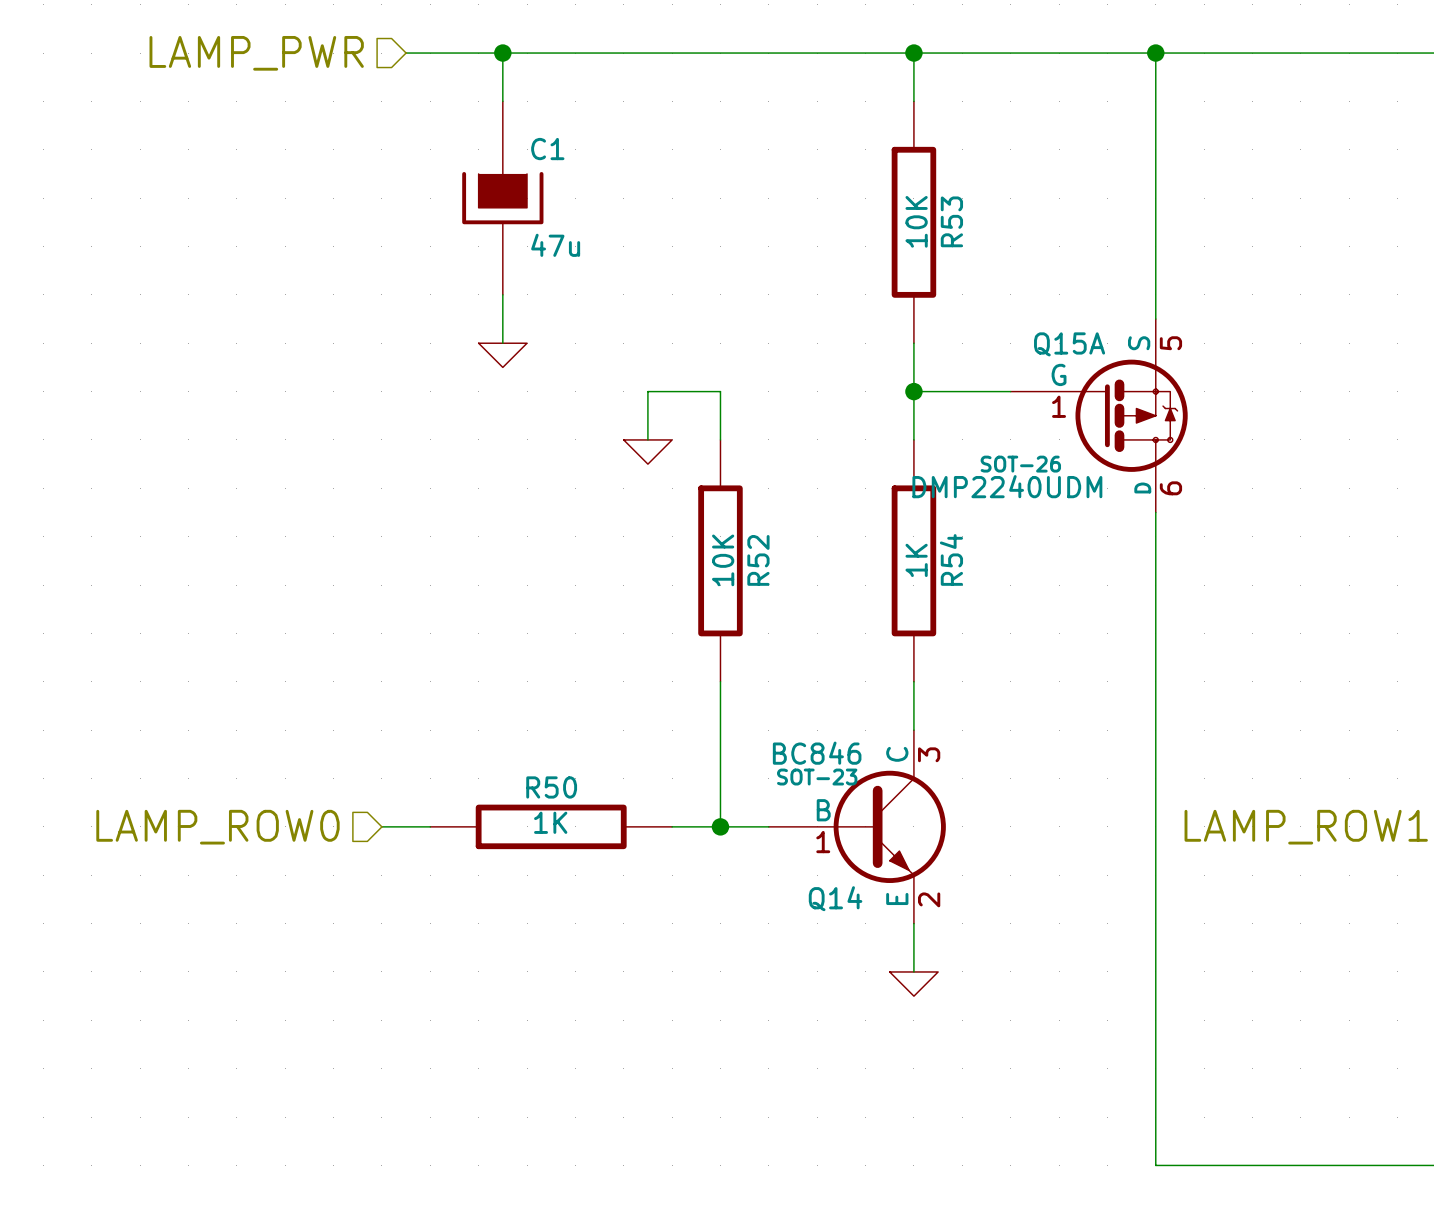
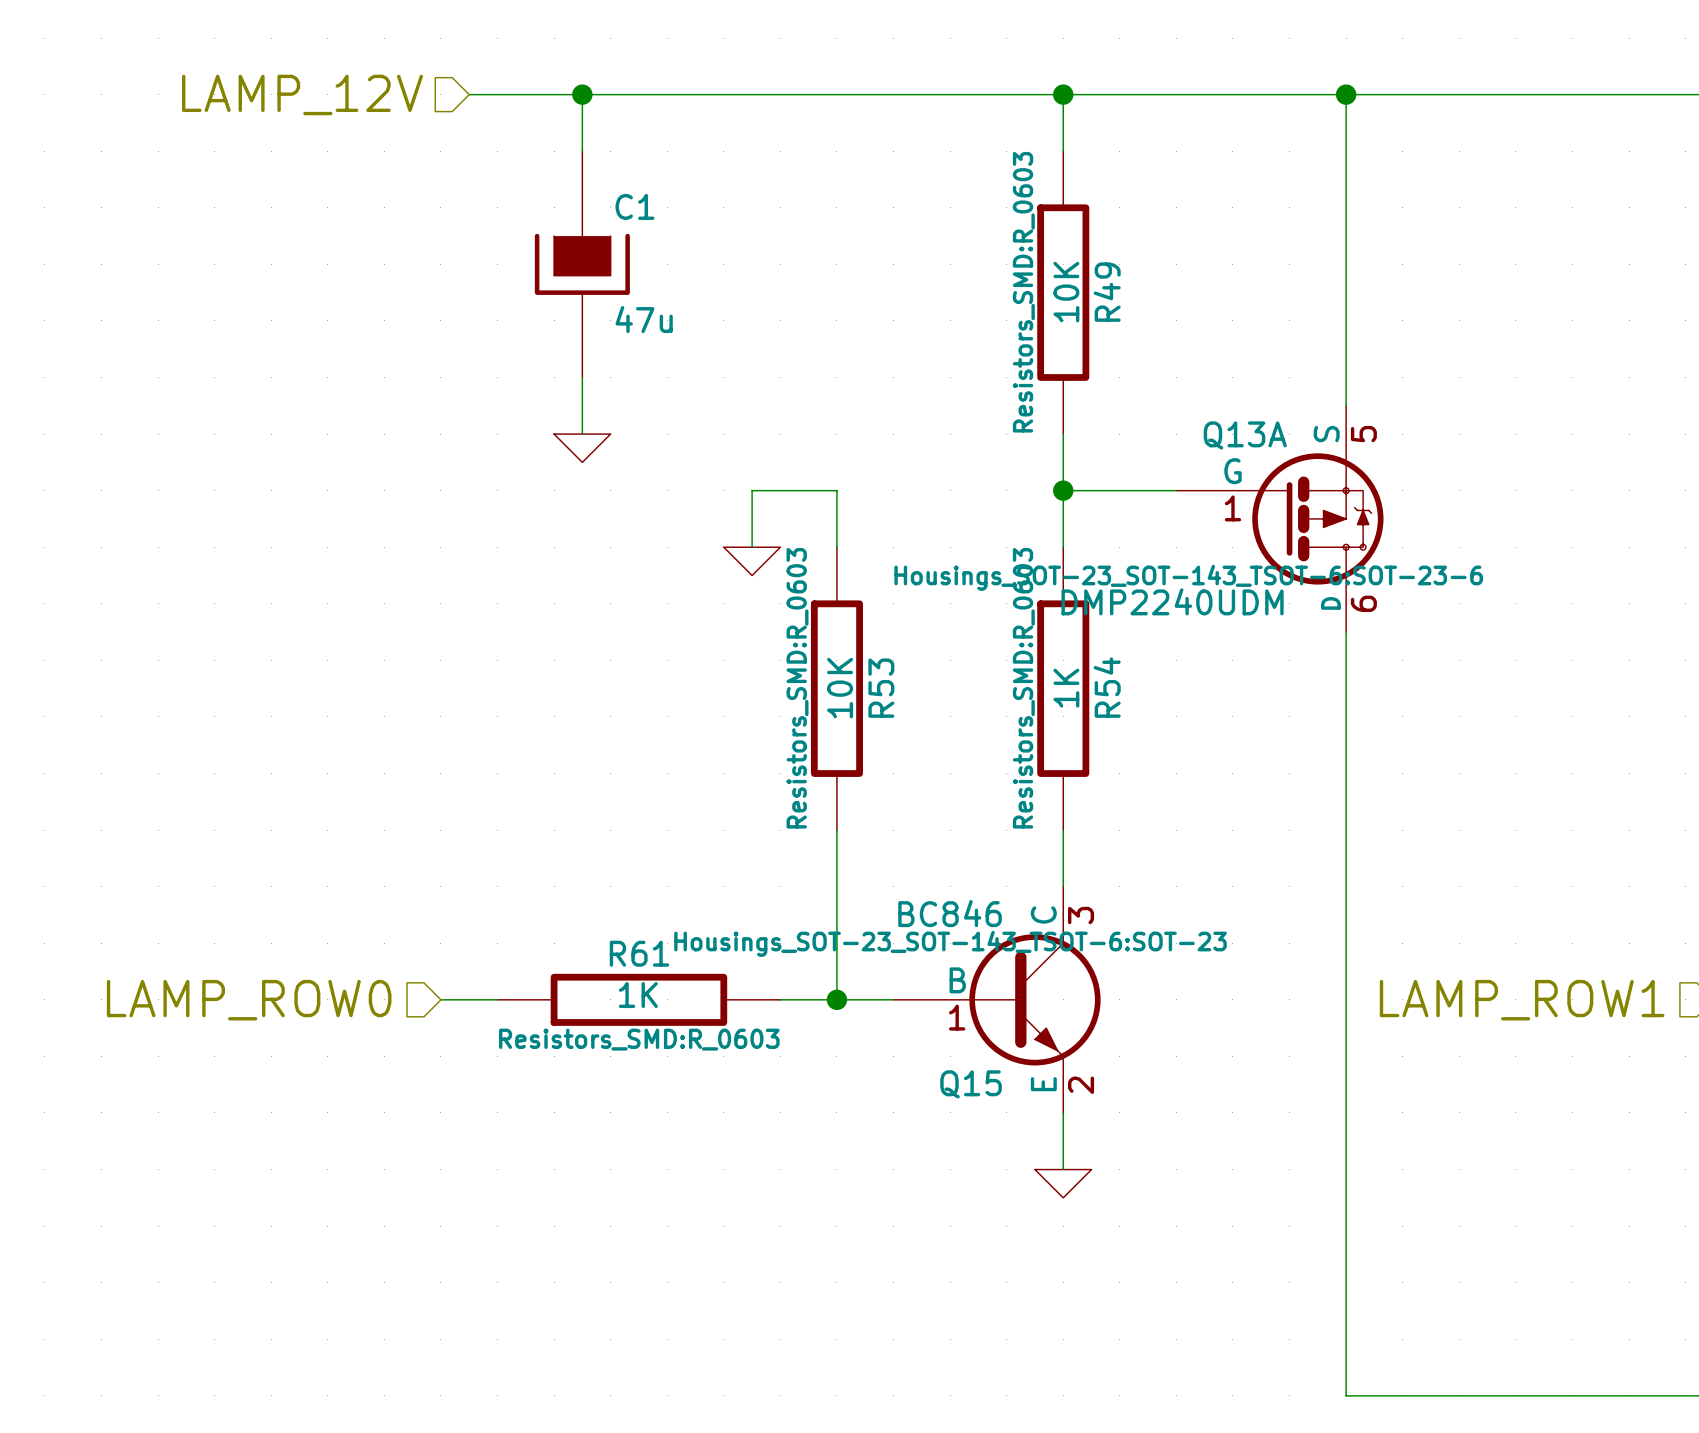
hierarchical label: LAMP_PWR (256, 53) -> LAMP_12V (302, 94)
R53 text: none -> Resistors_SMD:R_0603 (1023, 292)
R53 name: R53 (951, 221) -> R49 (1107, 292)
Q15A name: Q15A (1069, 344) -> Q13A (1245, 435)
Q15A text: SOT-26 (1020, 464) -> Housings_SOT-23_SOT-143_TSOT-6:SOT-23-6 (1188, 577)
R52 text: none -> Resistors_SMD:R_0603 (797, 688)
R52 name: R52 (758, 560) -> R53 (881, 688)
R54 text: none -> Resistors_SMD:R_0603 (1023, 688)
Q14 text: SOT-23 (817, 777) -> Housings_SOT-23_SOT-143_TSOT-6:SOT-23 (950, 943)
R50 name: R50 (551, 787) -> R61 (639, 953)
R50 text: none -> Resistors_SMD:R_0603 (639, 1039)
Q14 name: Q14 (835, 898) -> Q15 (971, 1084)

